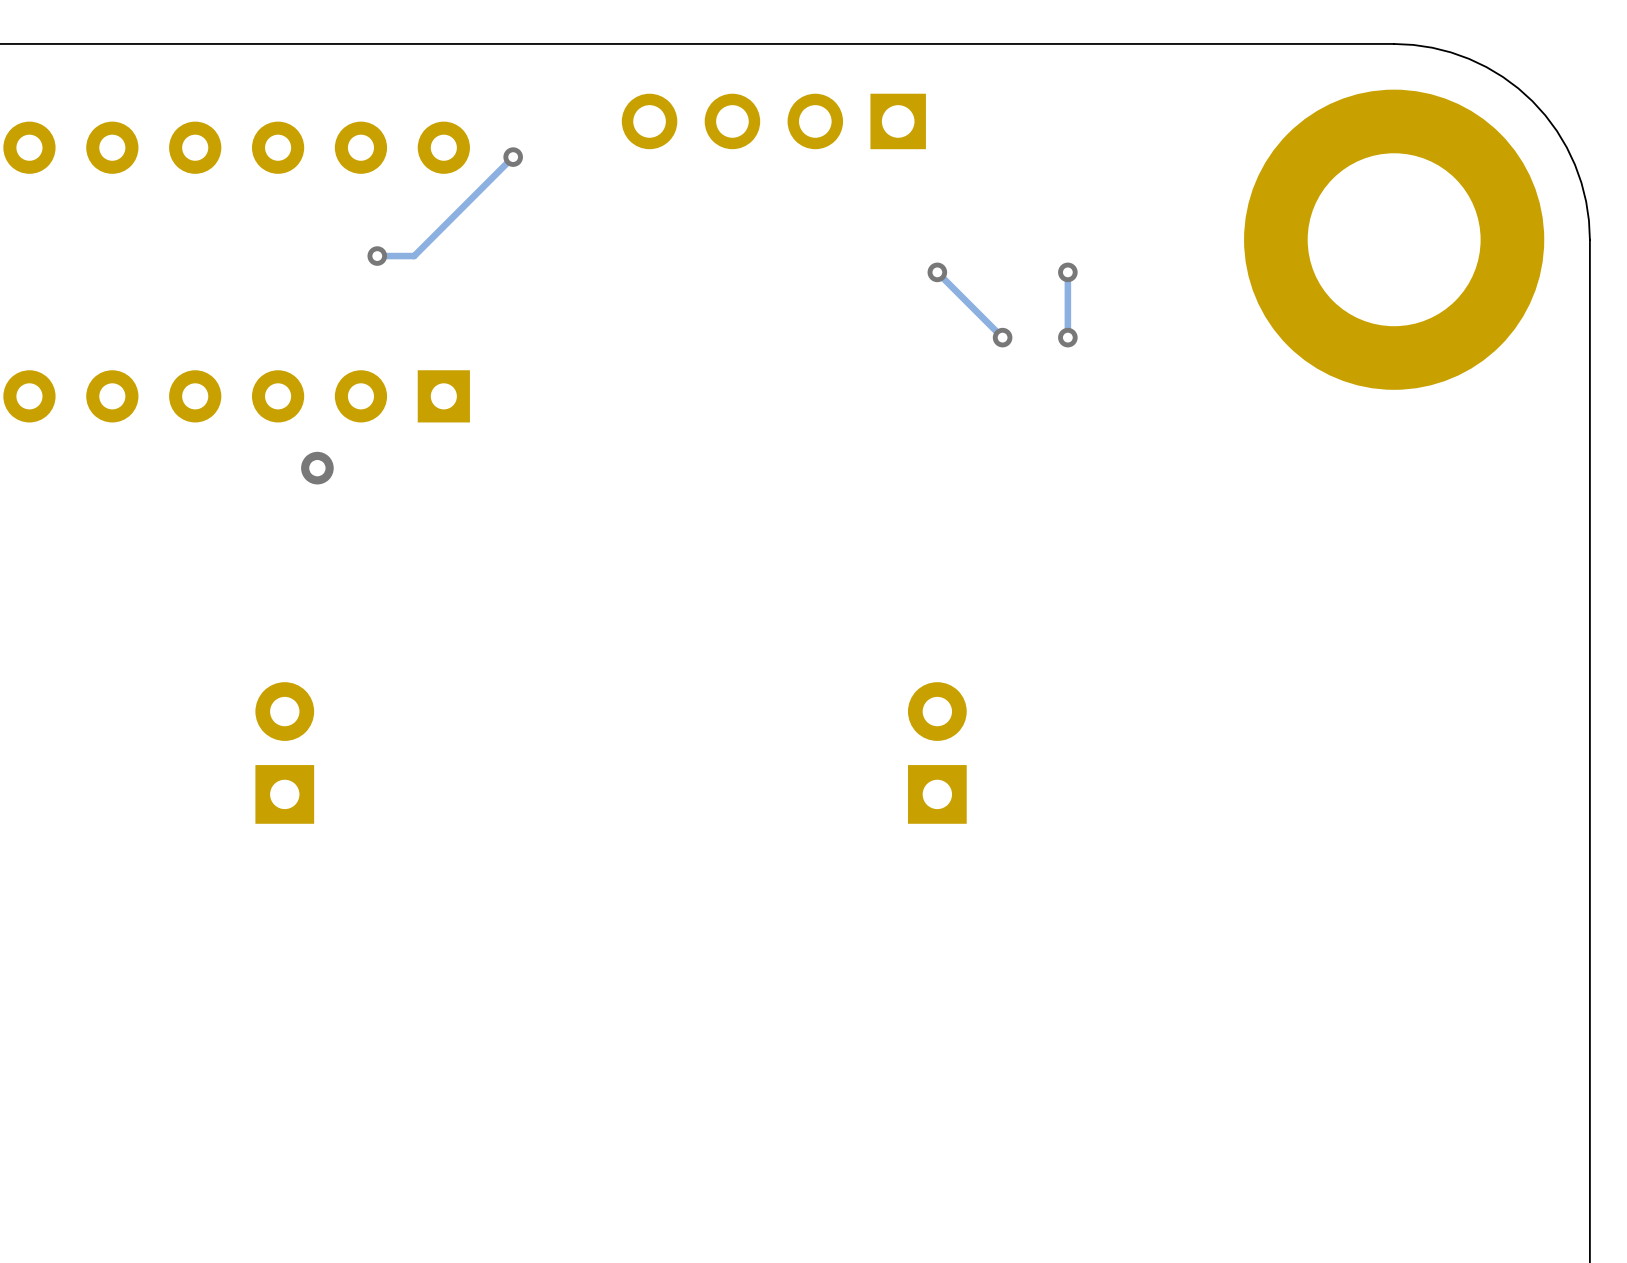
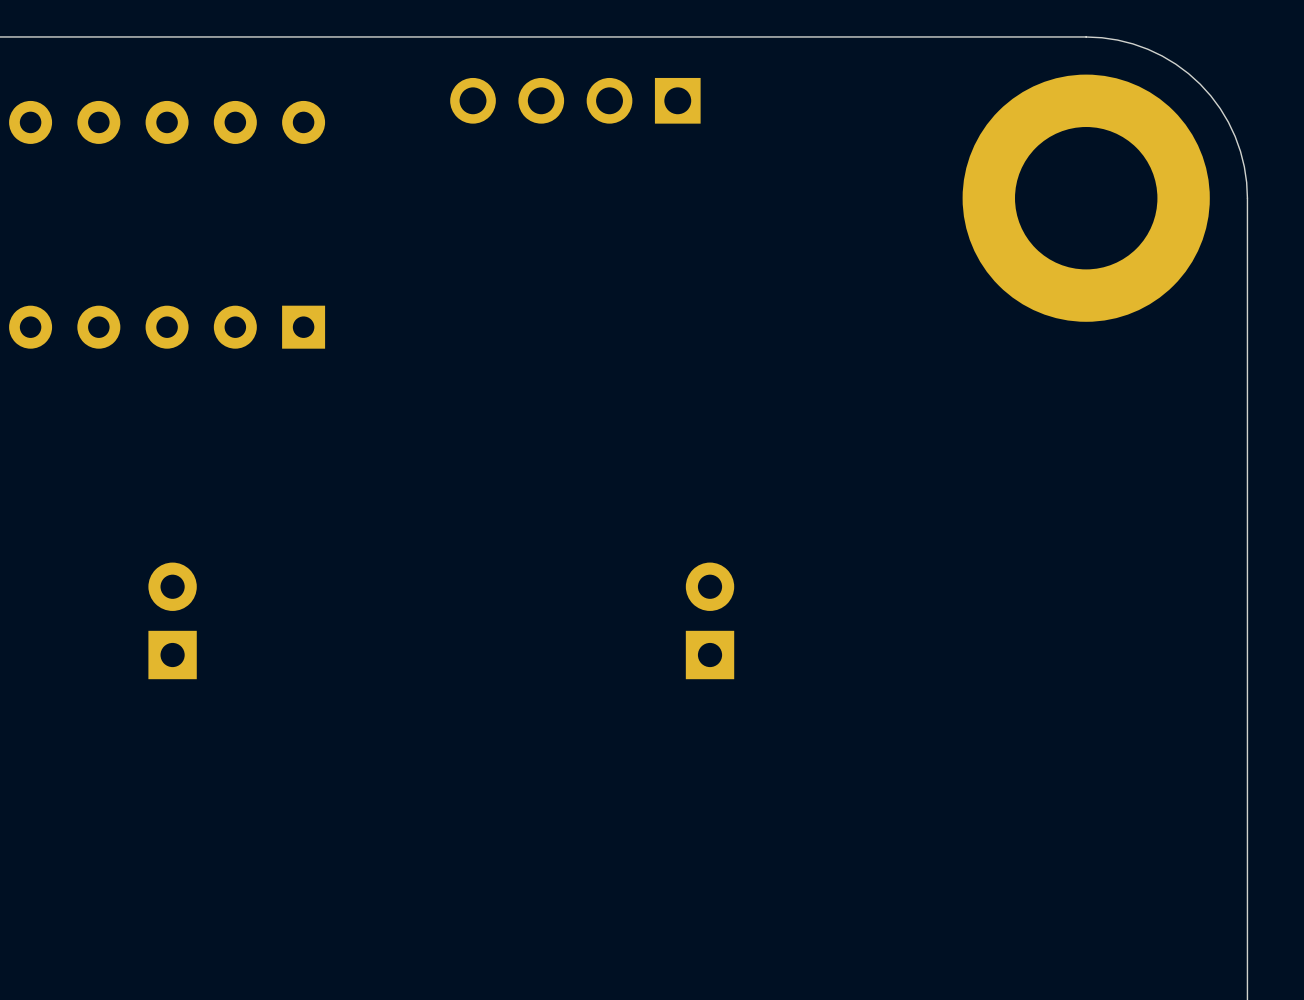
track: (513, 157) (414, 256) (377, 256) -> none
via: (513, 157) -> none
via: (377, 256) -> none
track: (937, 272) (1002, 337) -> none
via: (937, 272) -> none
track: (1067, 272) (1067, 337) -> none
via: (1067, 272) -> none
via: (1002, 337) -> none
via: (1067, 337) -> none
via: (317, 468) -> none

